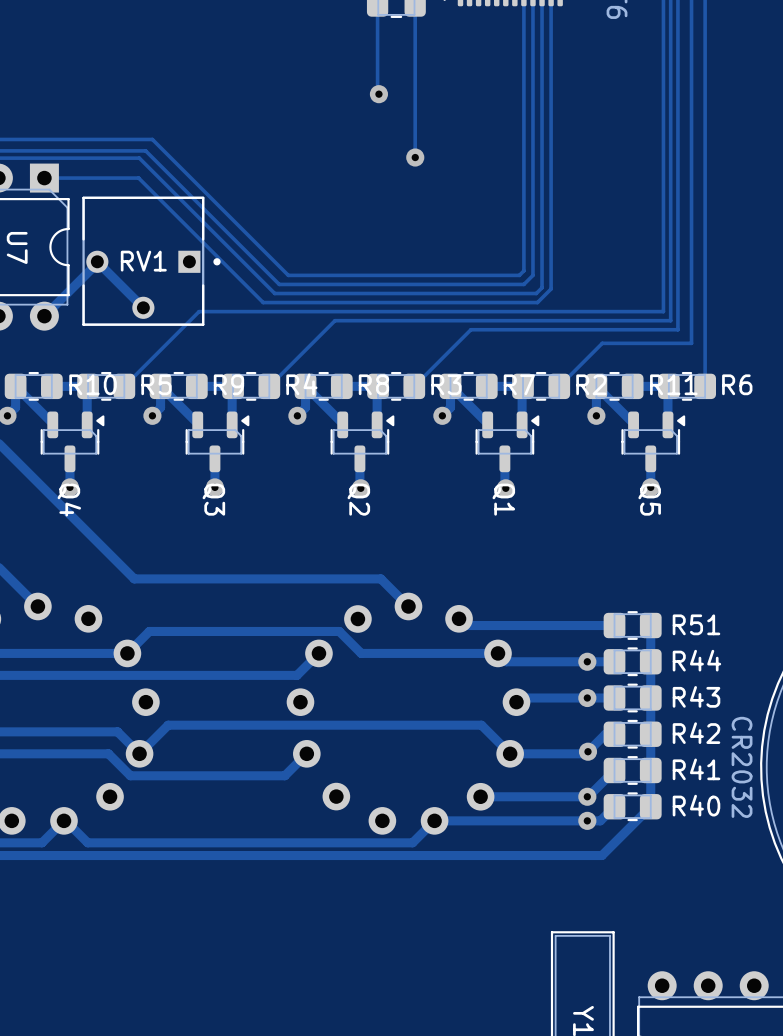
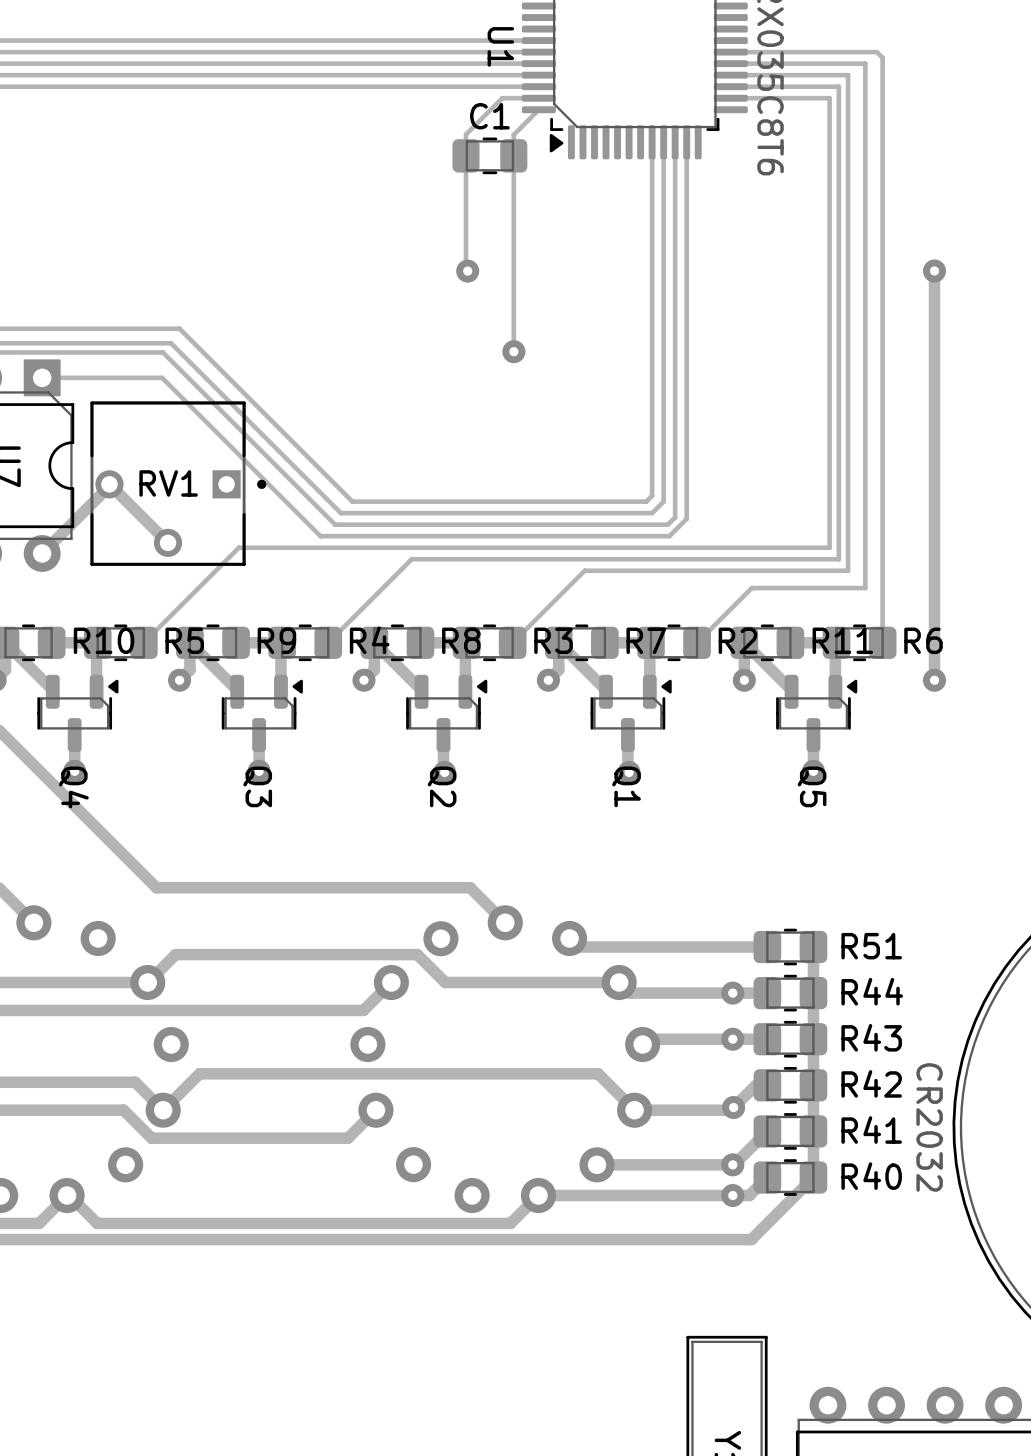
track: none -> (934, 271) (934, 680)
via: none -> (934, 271)
via: none -> (934, 680)

